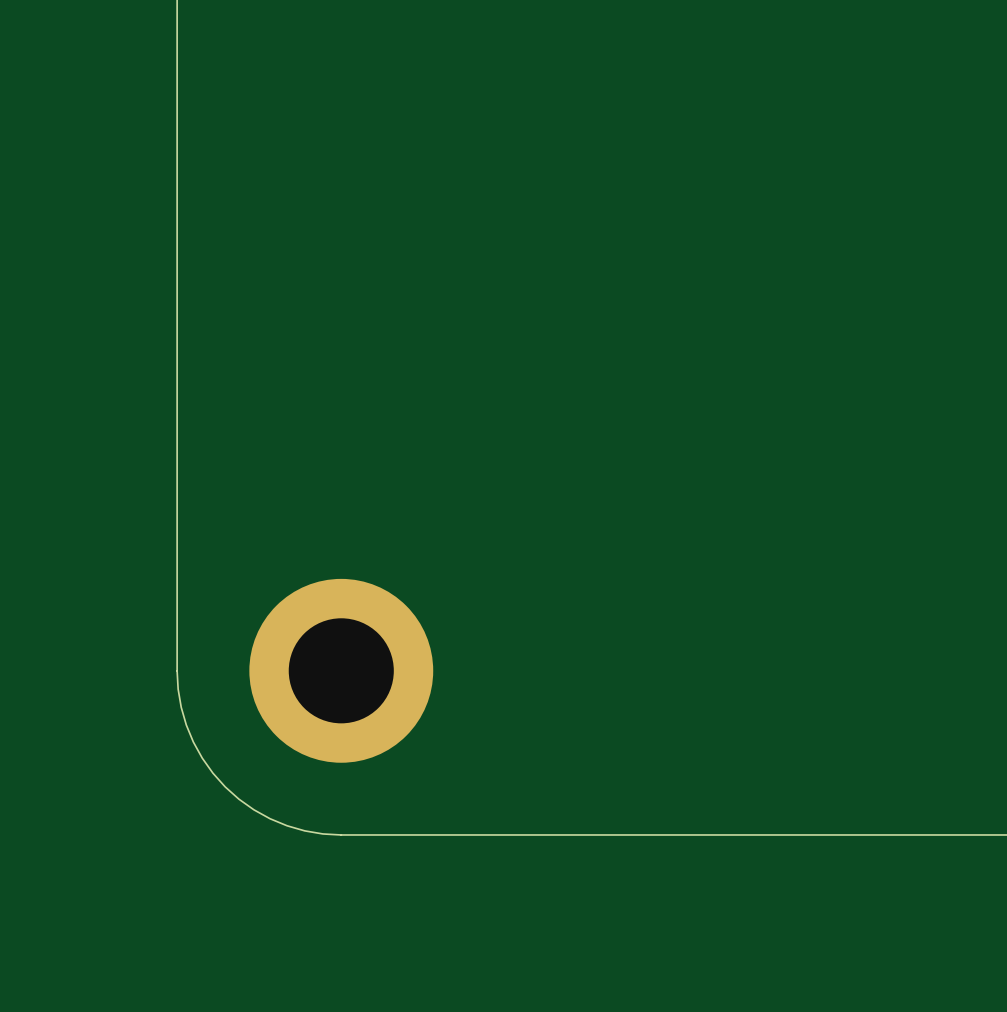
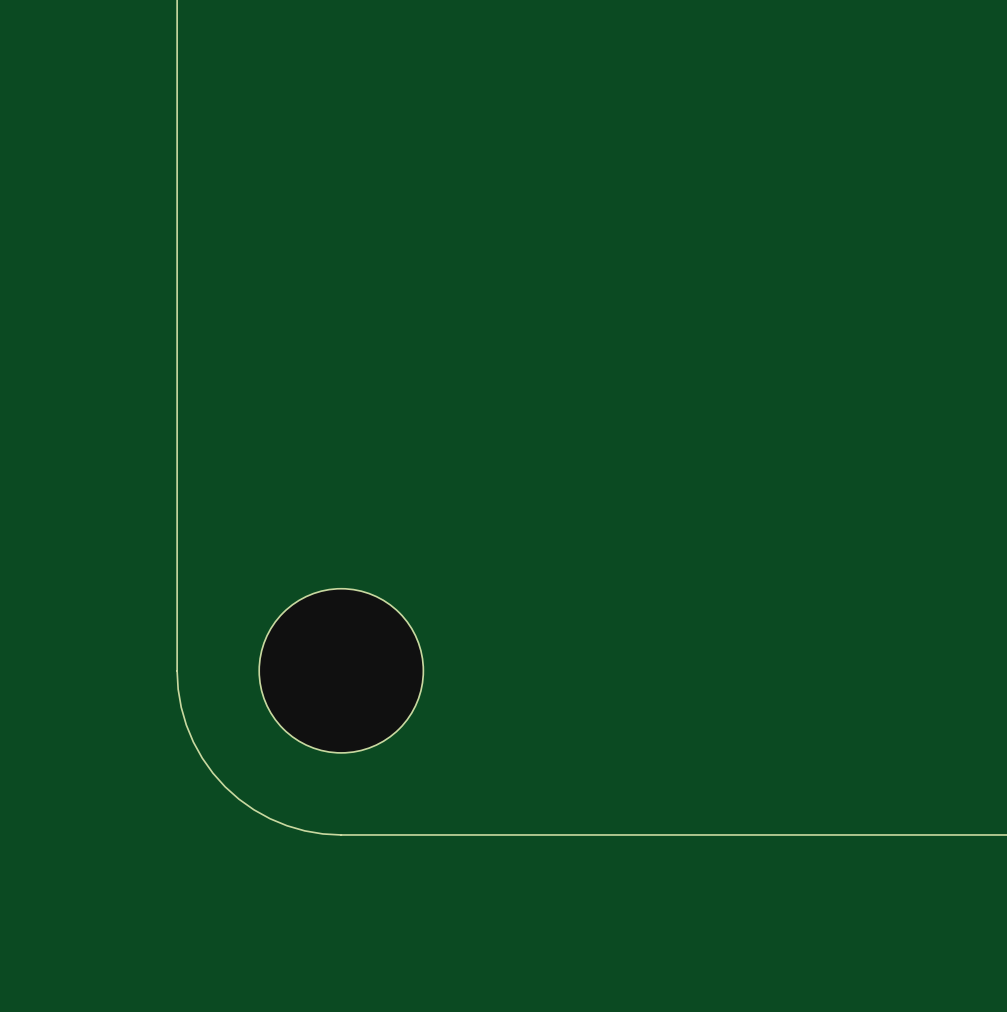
part footprint: [249, 578, 434, 763] -> [259, 588, 424, 753]

